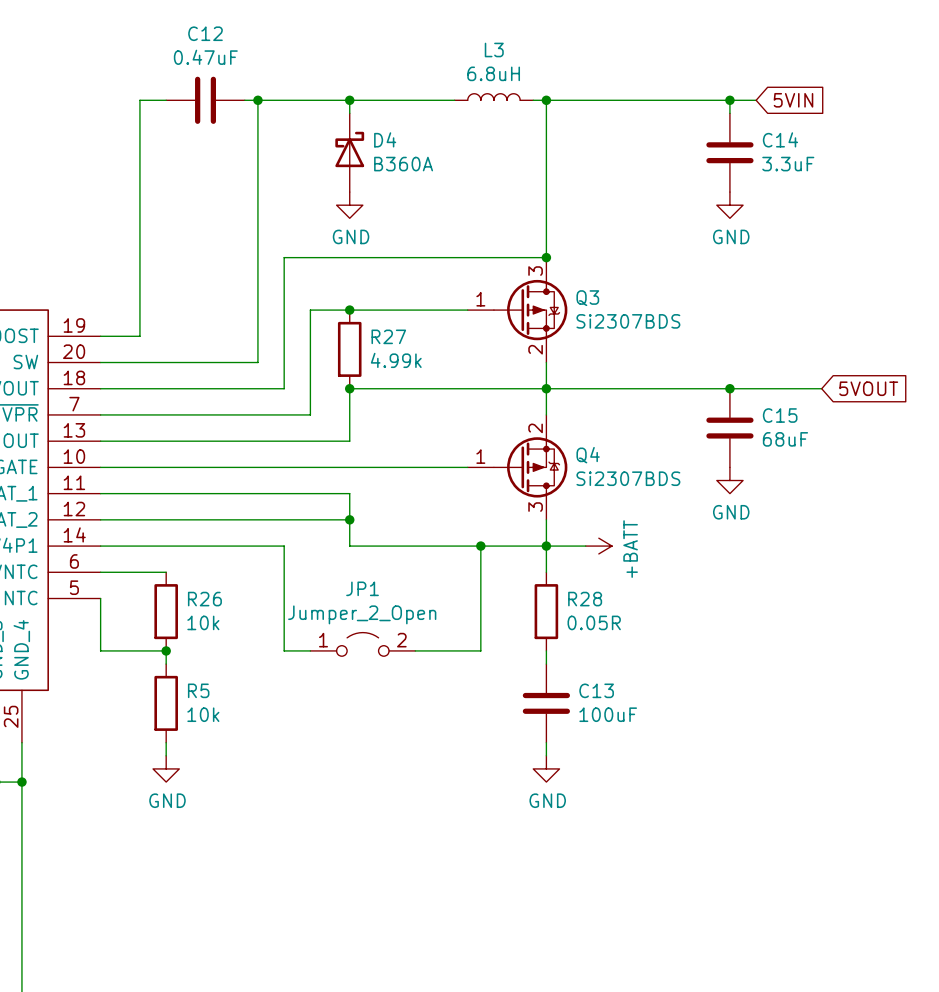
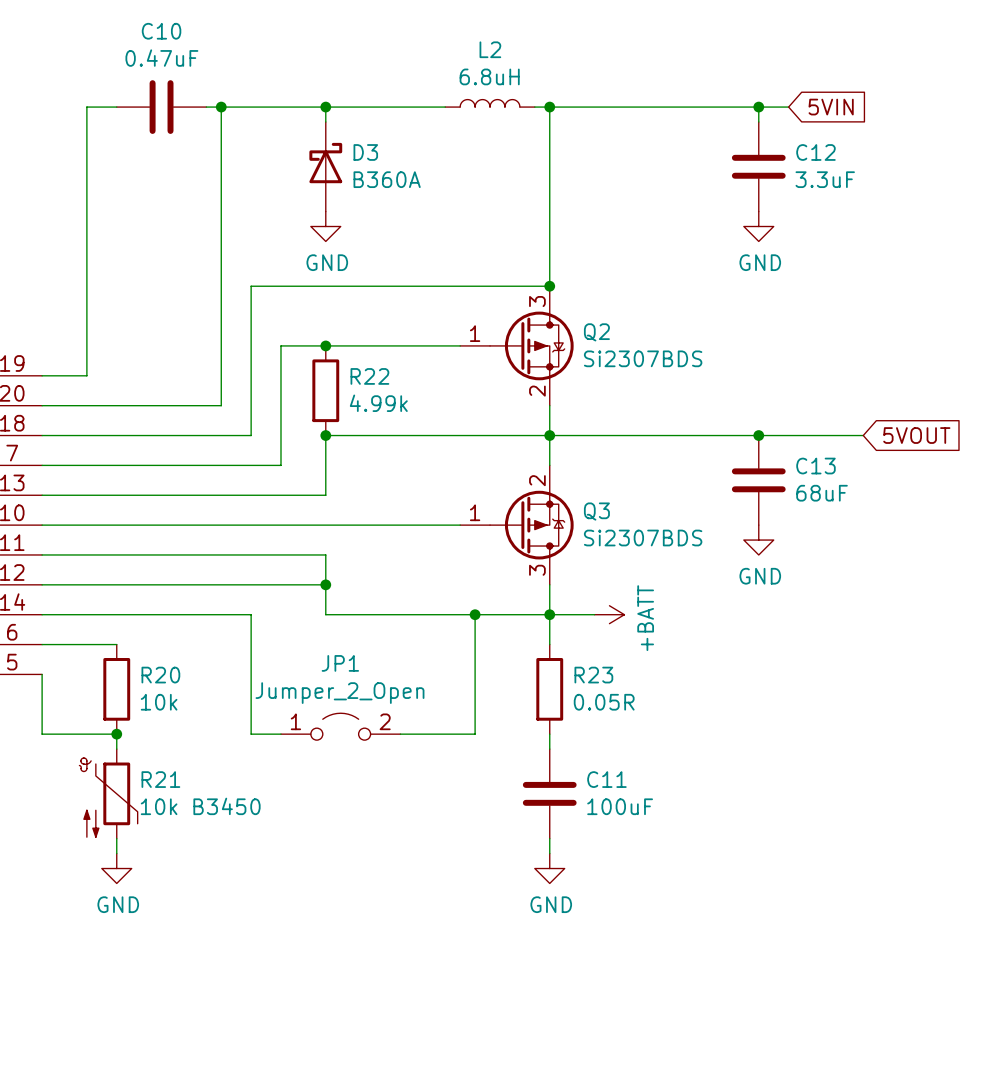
C12 name: C12 (205, 33) -> C10 (161, 31)
L3 name: L3 (494, 49) -> L2 (490, 49)
D4 name: D4 (385, 139) -> D3 (365, 152)
C14 name: C14 (780, 139) -> C12 (815, 152)
Q3 name: Q3 (587, 298) -> Q2 (596, 332)
R27 name: R27 (388, 336) -> R22 (369, 376)
C15 name: C15 (780, 415) -> C13 (815, 466)
Q4 name: Q4 (588, 455) -> Q3 (596, 511)
R26 name: R26 (204, 599) -> R20 (160, 675)
R28 name: R28 (585, 599) -> R23 (593, 675)
C13 name: C13 (596, 690) -> C11 (606, 779)
R21: none -> 10k B3450 (108, 793)
R5: 10k (166, 703) -> none

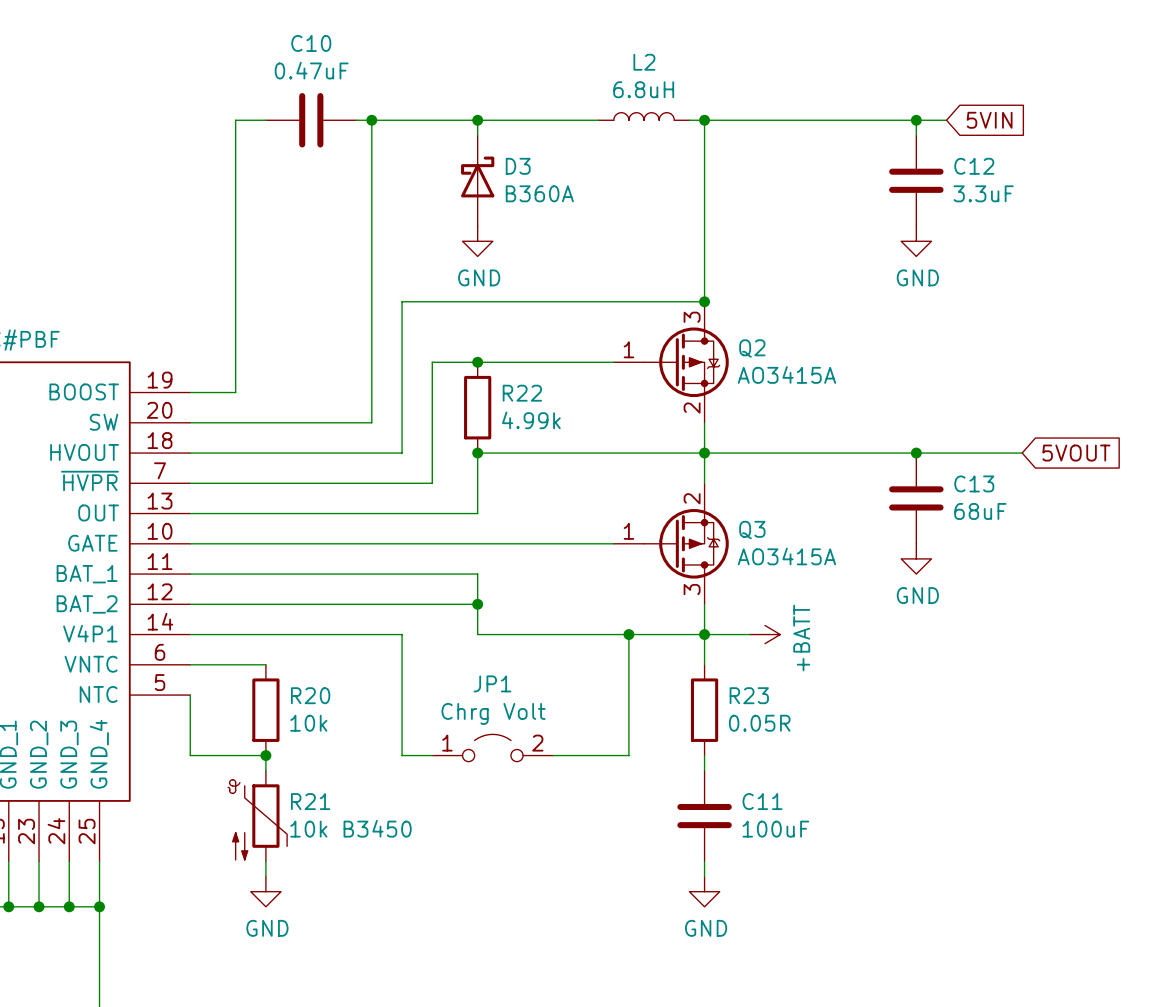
Q2 value: Si2307BDS (643, 358) -> AO3415A (786, 374)
Q3 value: Si2307BDS (643, 538) -> AO3415A (786, 556)
JP1 value: Jumper_2_Open (340, 693) -> Chrg Volt (493, 713)

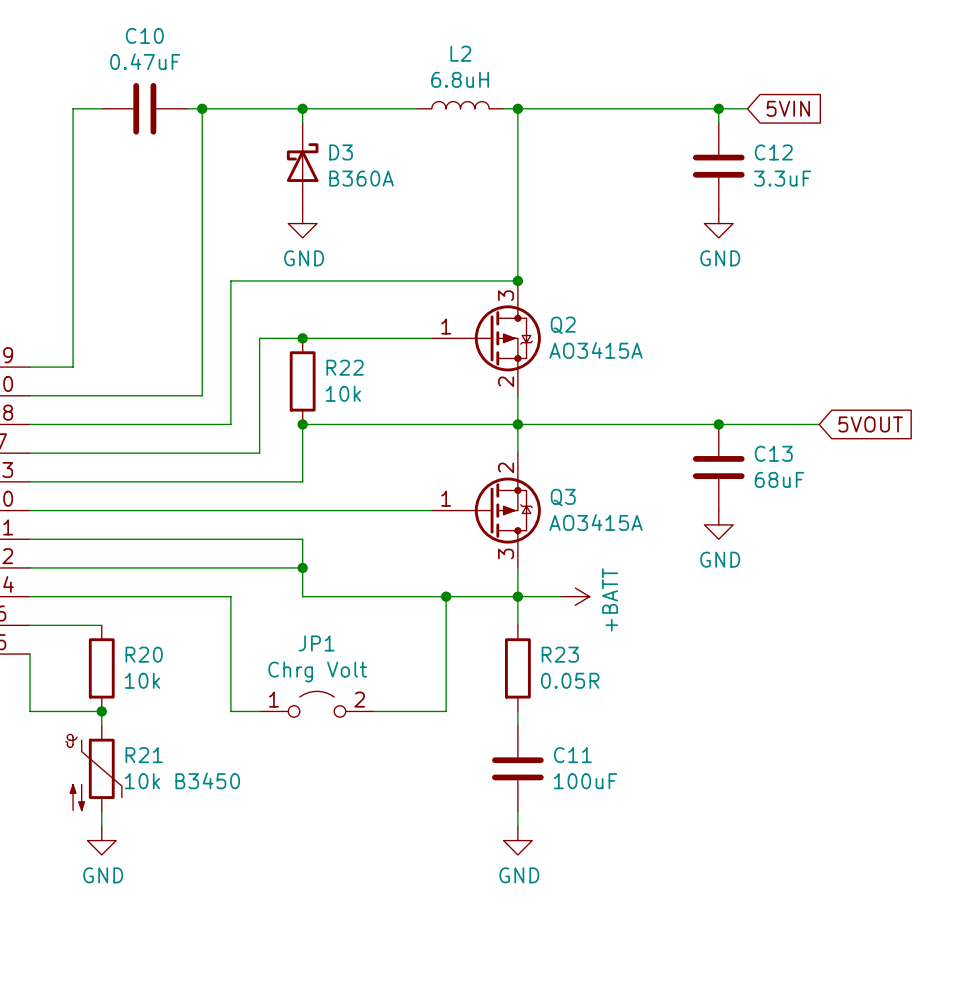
R22 value: 4.99k (531, 420) -> 10k (343, 393)

